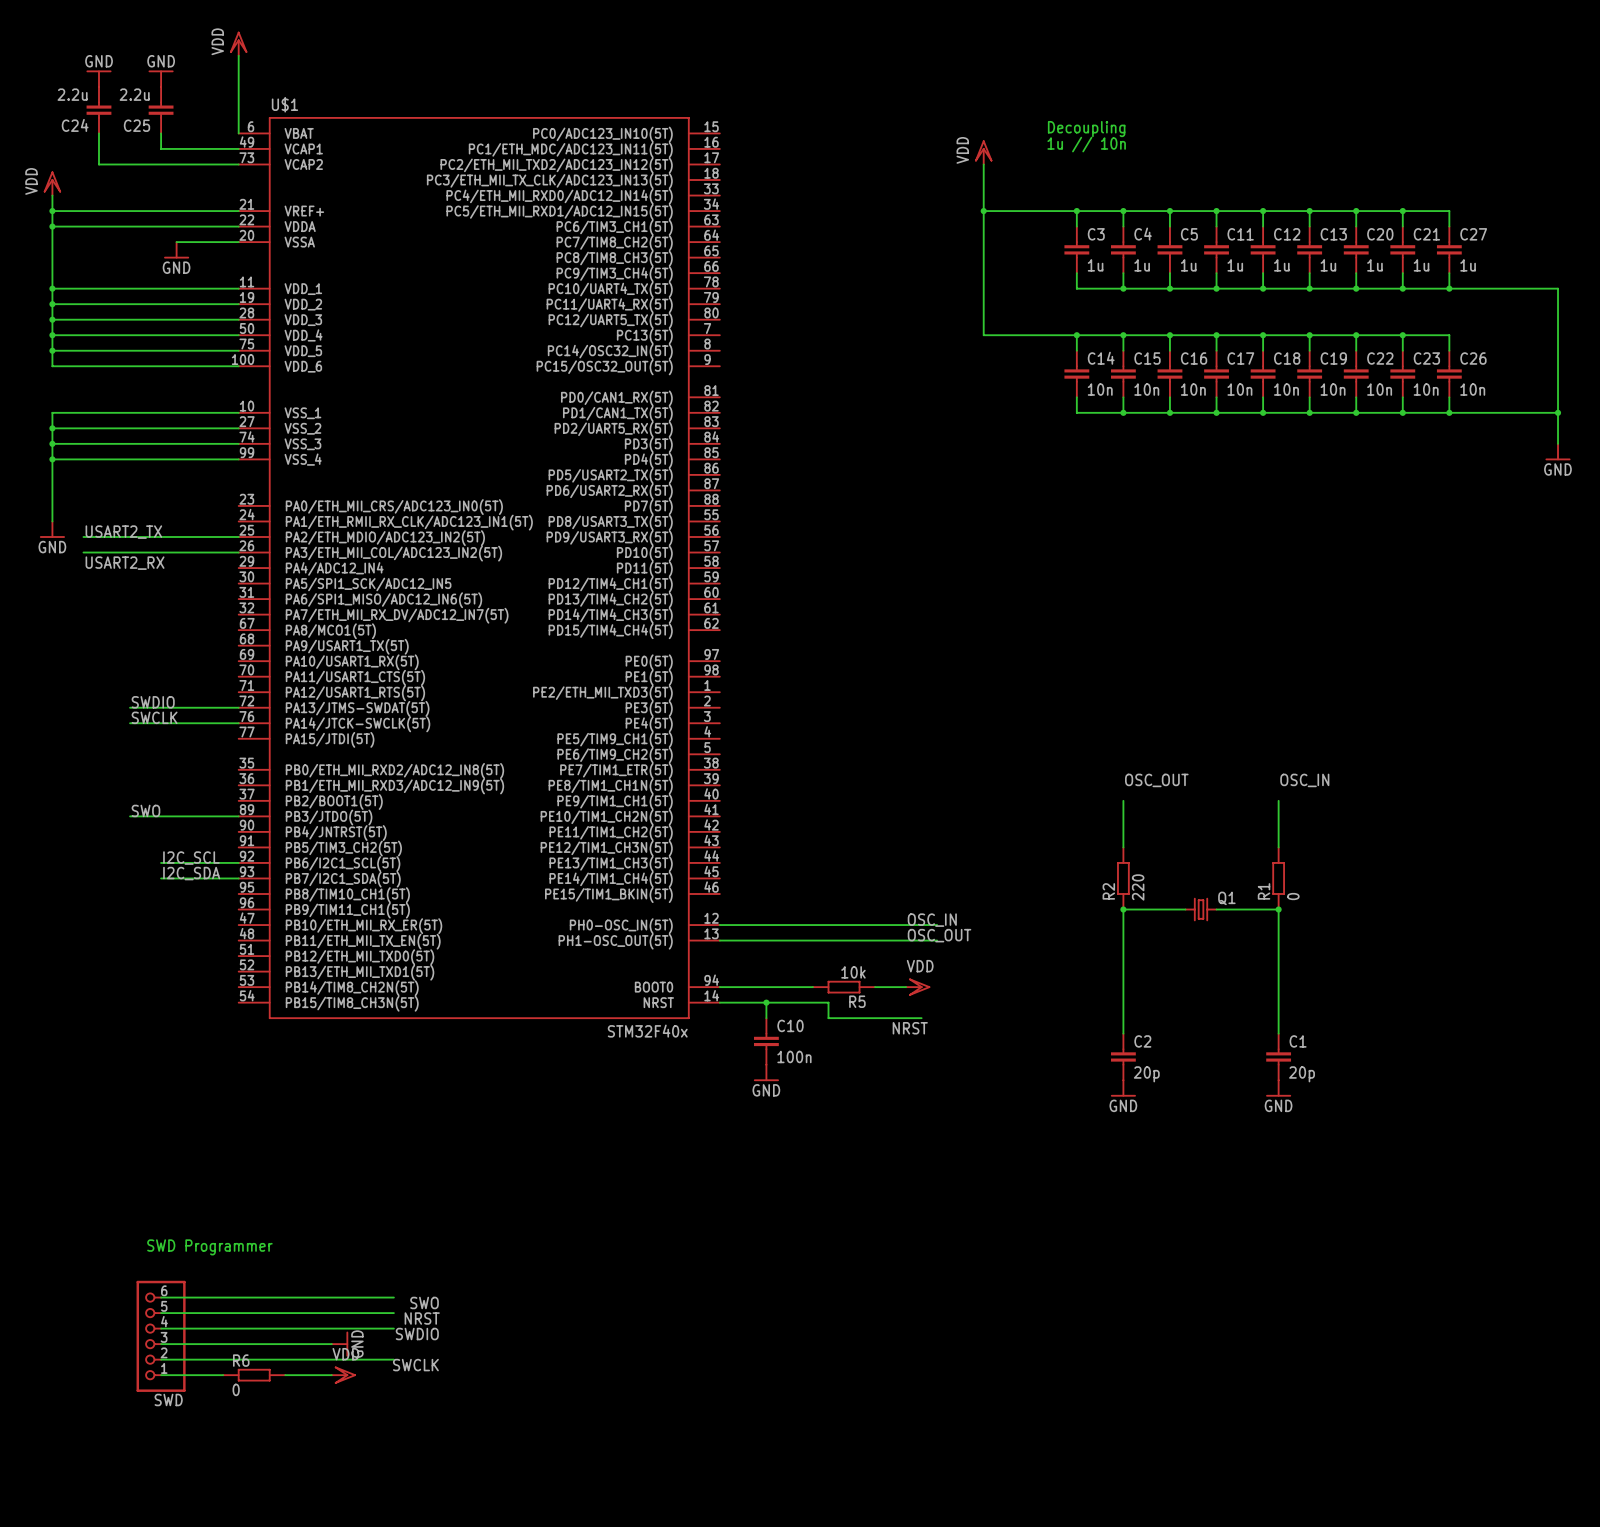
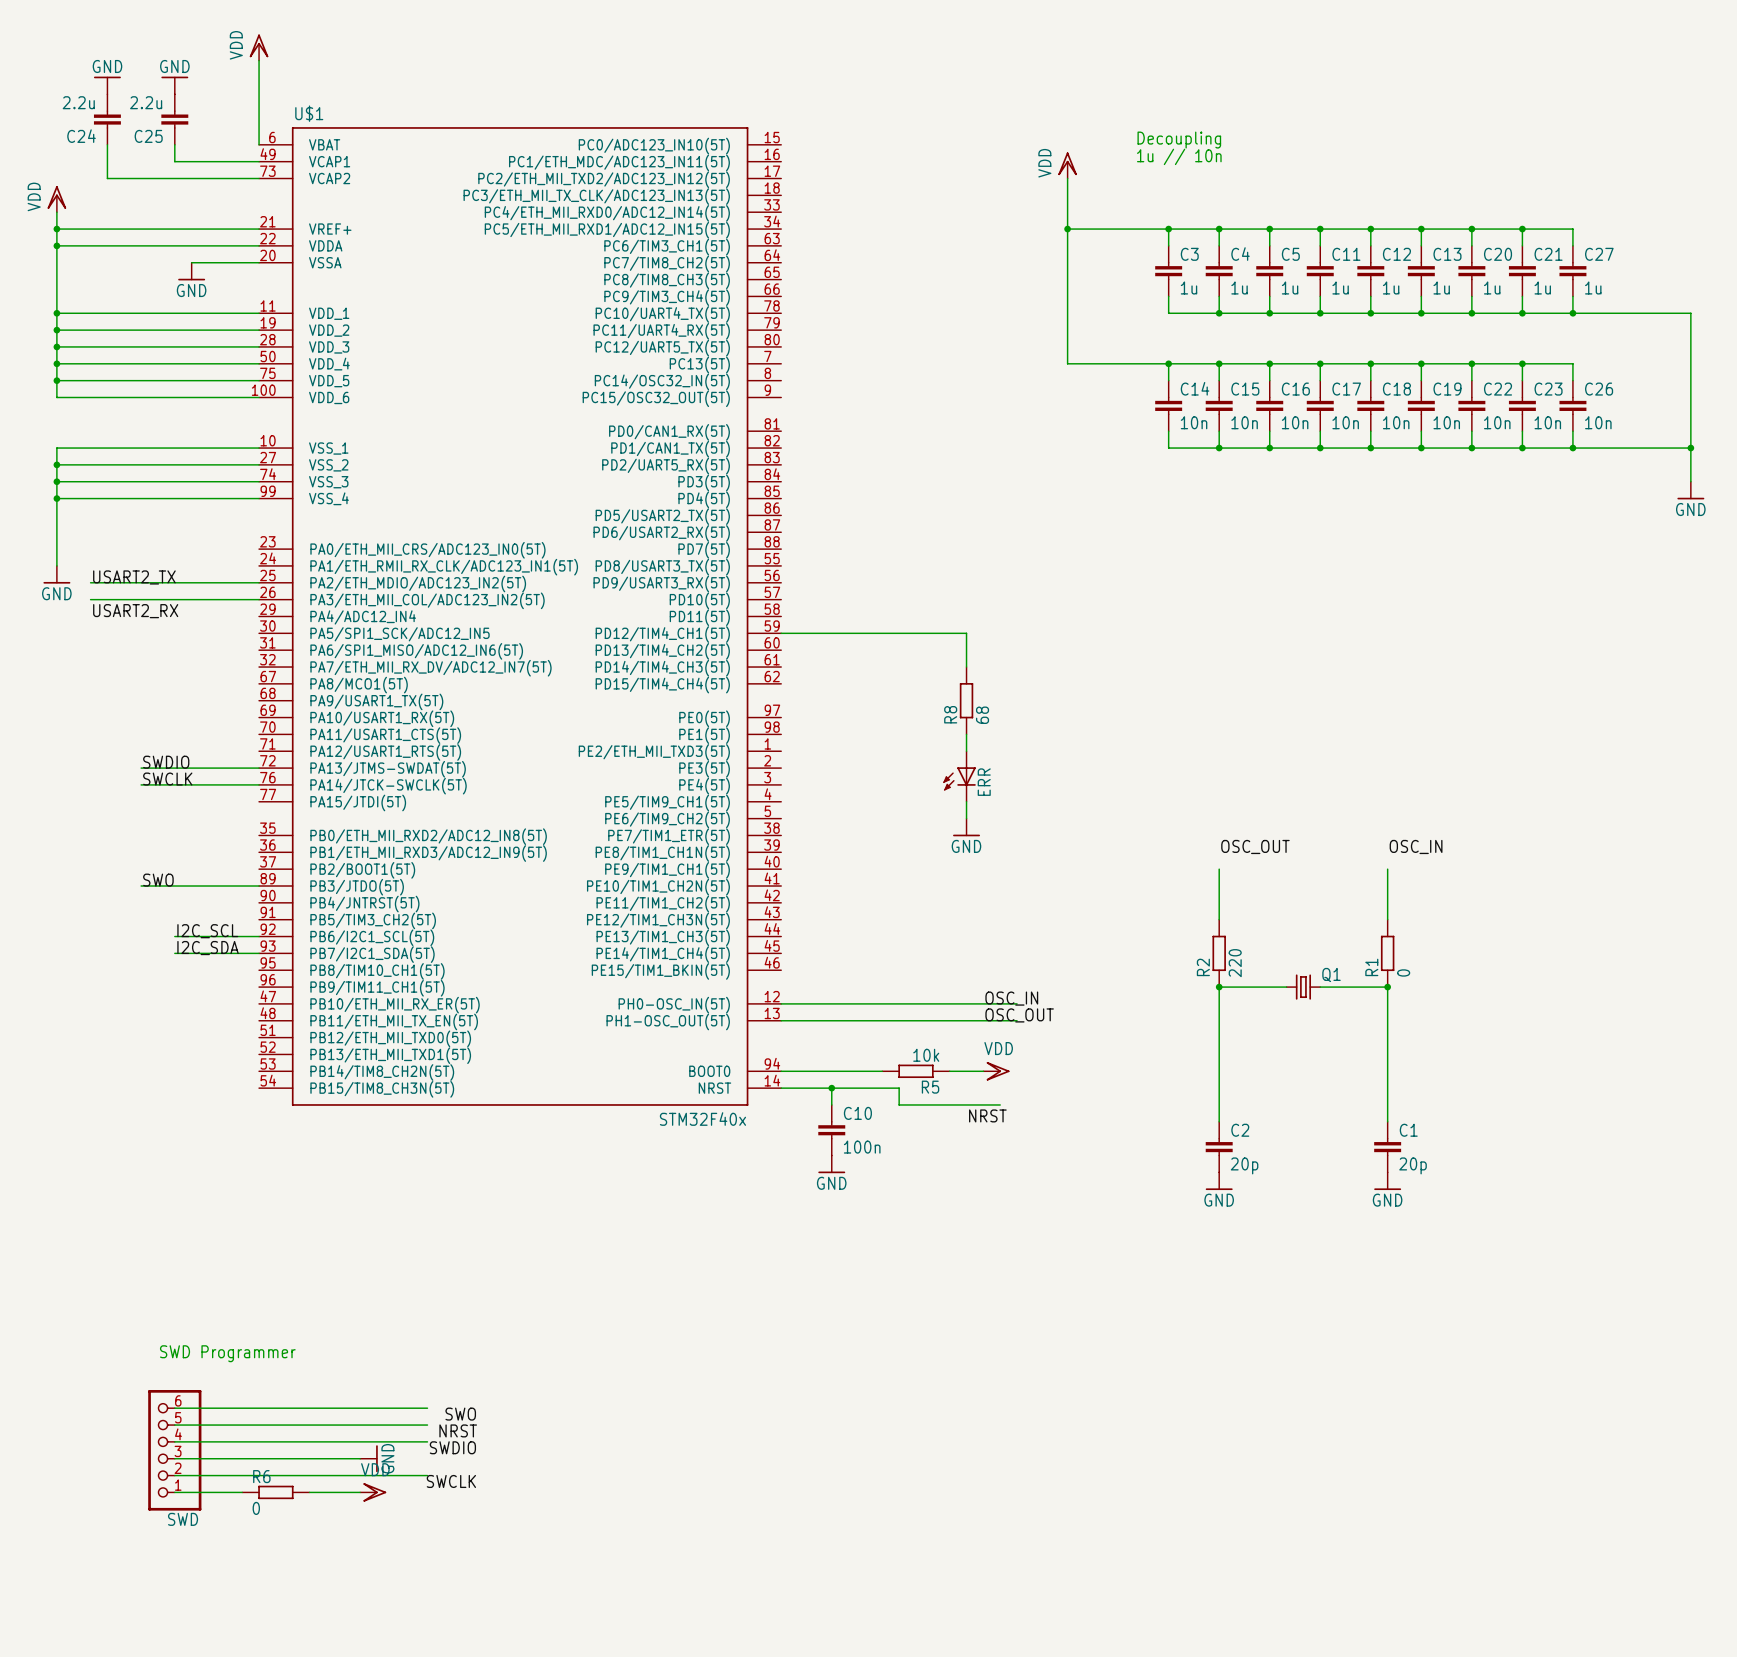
wire: none -> (781, 633) (966, 633) (966, 667)
R8: none -> 68 (966, 700)
wire: none -> (966, 734) (966, 751)
ERR: none -> (959, 776)
wire: none -> (966, 801) (966, 818)
power symbol: none -> GND (966, 827)

